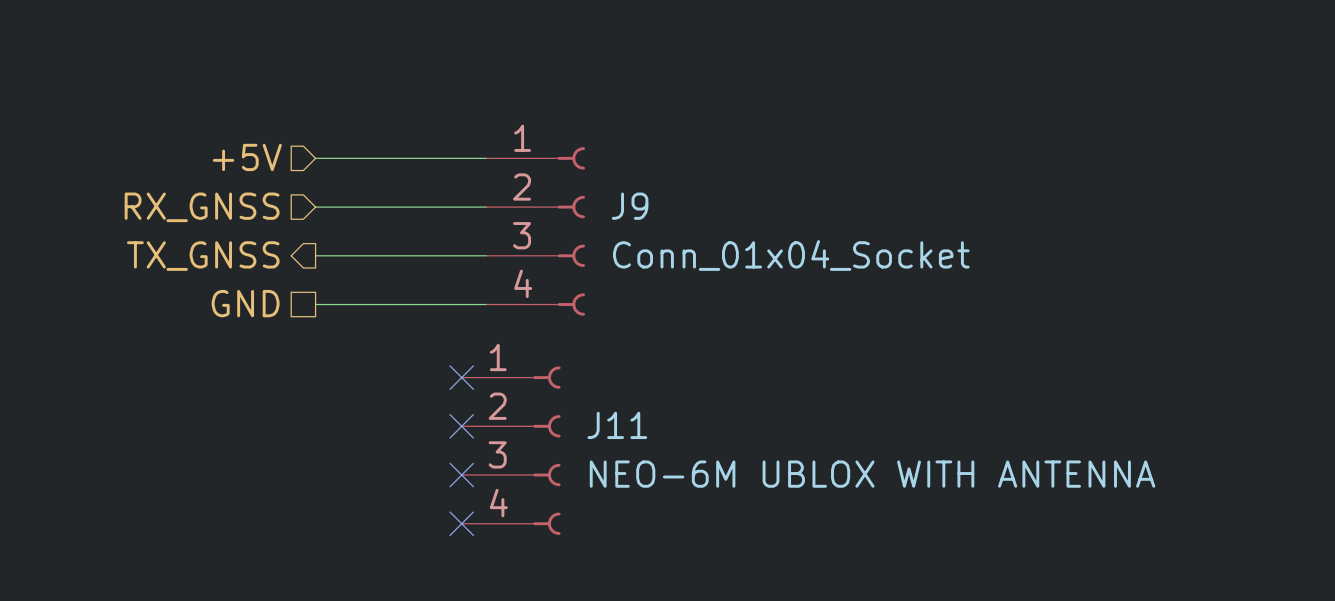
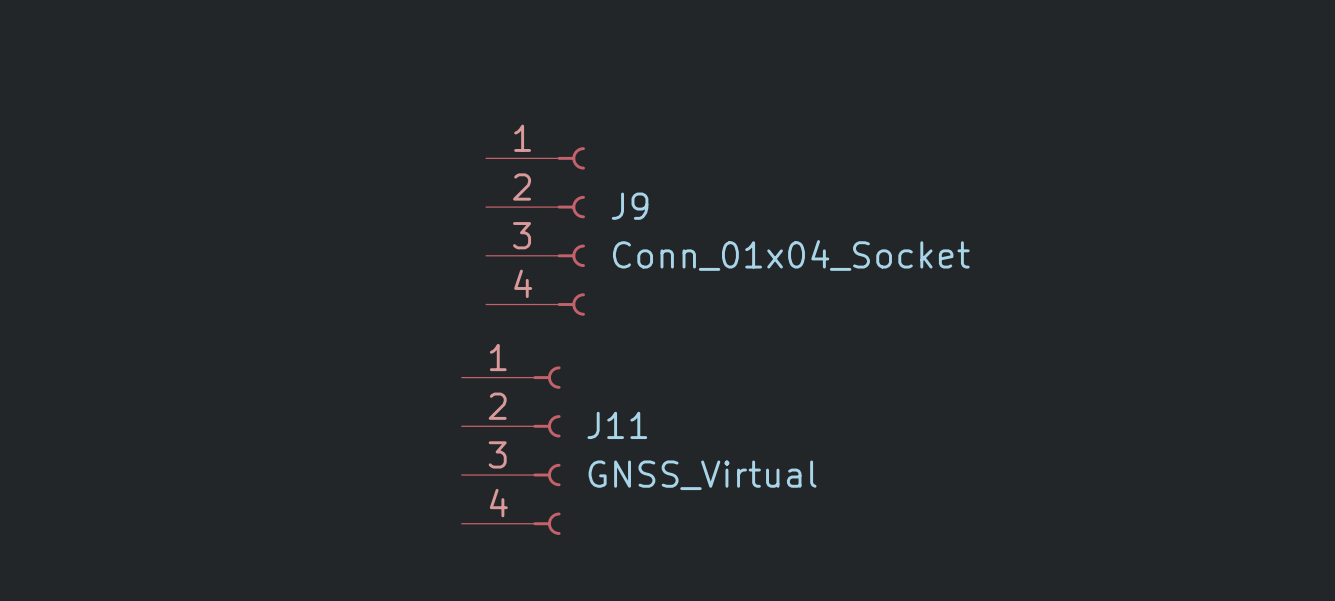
hierarchical label: +5V (247, 157) -> none
wire: (315, 158) (486, 158) -> none
hierarchical label: RX_GNSS (202, 207) -> none
wire: (315, 207) (486, 207) -> none
wire: (315, 255) (486, 255) -> none
hierarchical label: TX_GNSS (203, 256) -> none
hierarchical label: GND (245, 303) -> none
wire: (315, 304) (486, 304) -> none
no-connect mark: (461, 377) -> none
no-connect mark: (461, 426) -> none
J11 value: NEO-6M UBLOX WITH ANTENNA (872, 474) -> GNSS_Virtual (702, 475)
no-connect mark: (461, 475) -> none
no-connect mark: (461, 523) -> none

